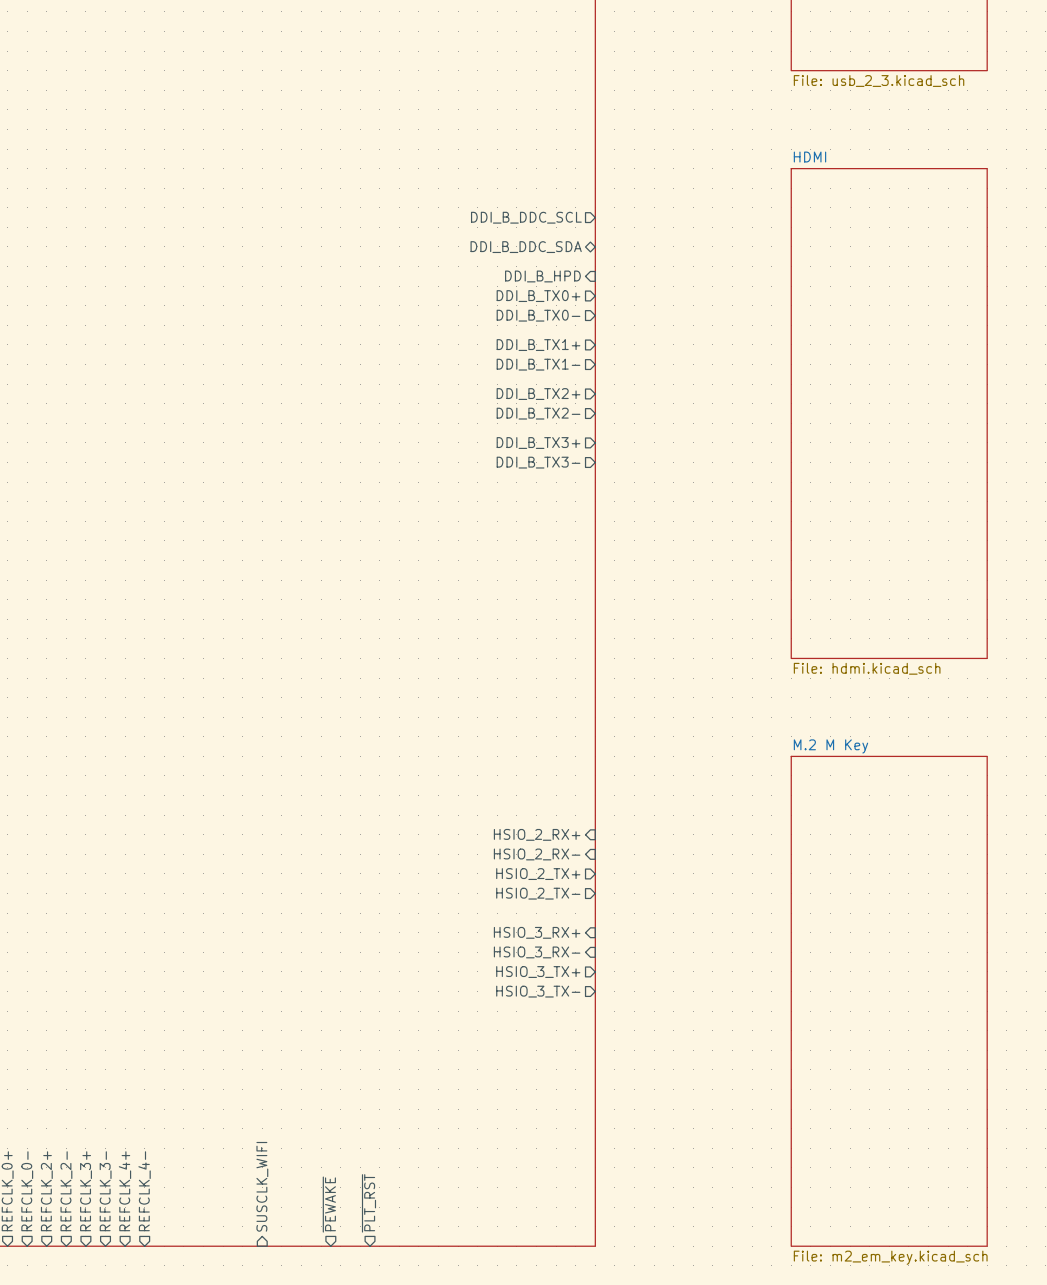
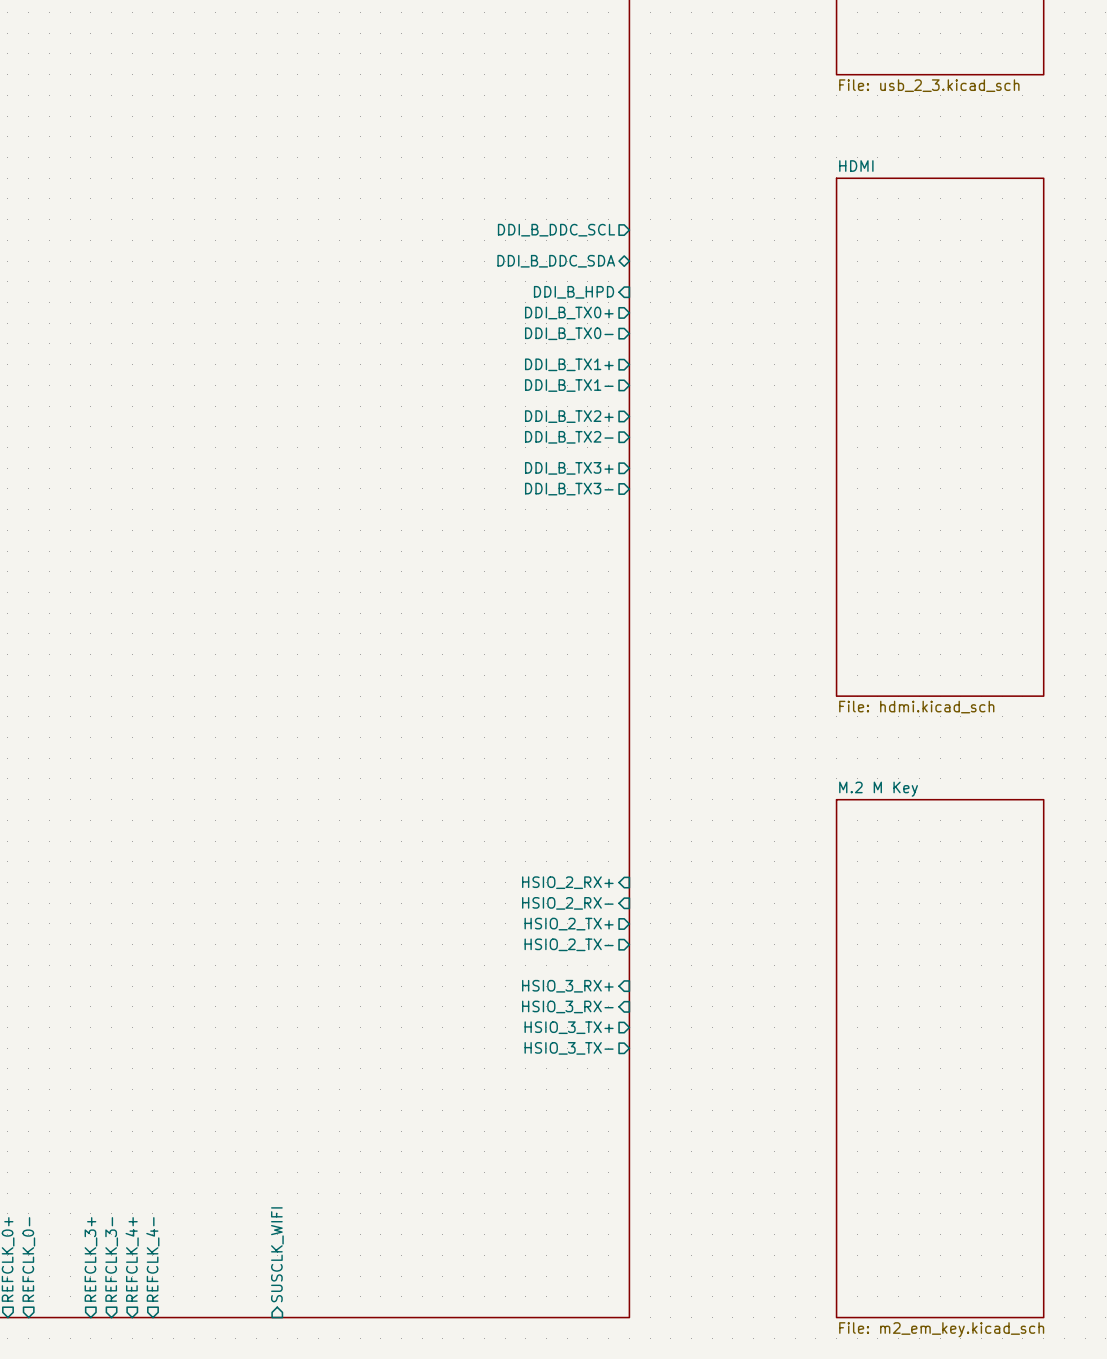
sheet pin: REFCLK_2+ (46, 1191) -> none
sheet pin: REFCLK_2- (66, 1191) -> none
sheet pin: ~{PLT_RST} (368, 1203) -> none
sheet pin: ~{PEWAKE} (329, 1204) -> none

